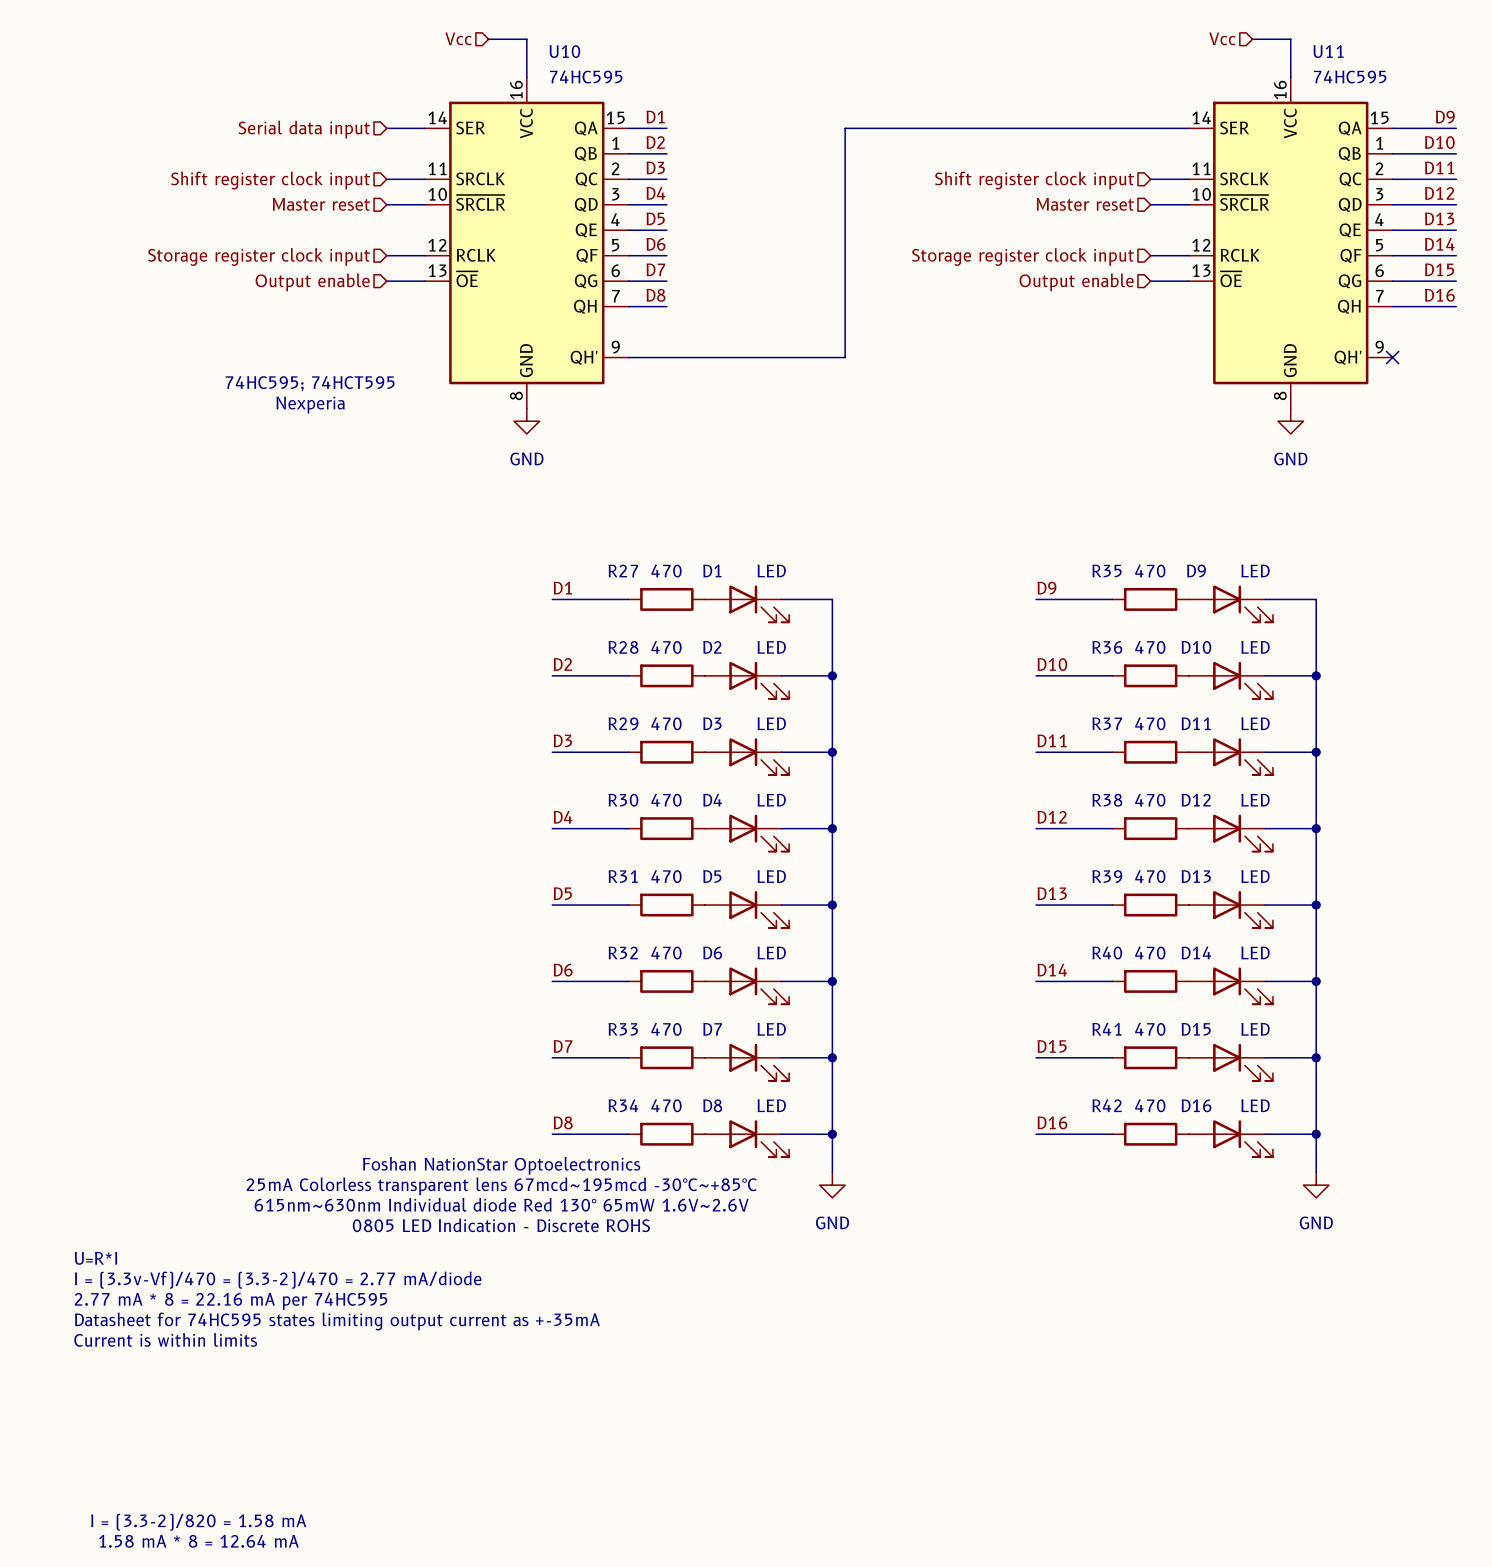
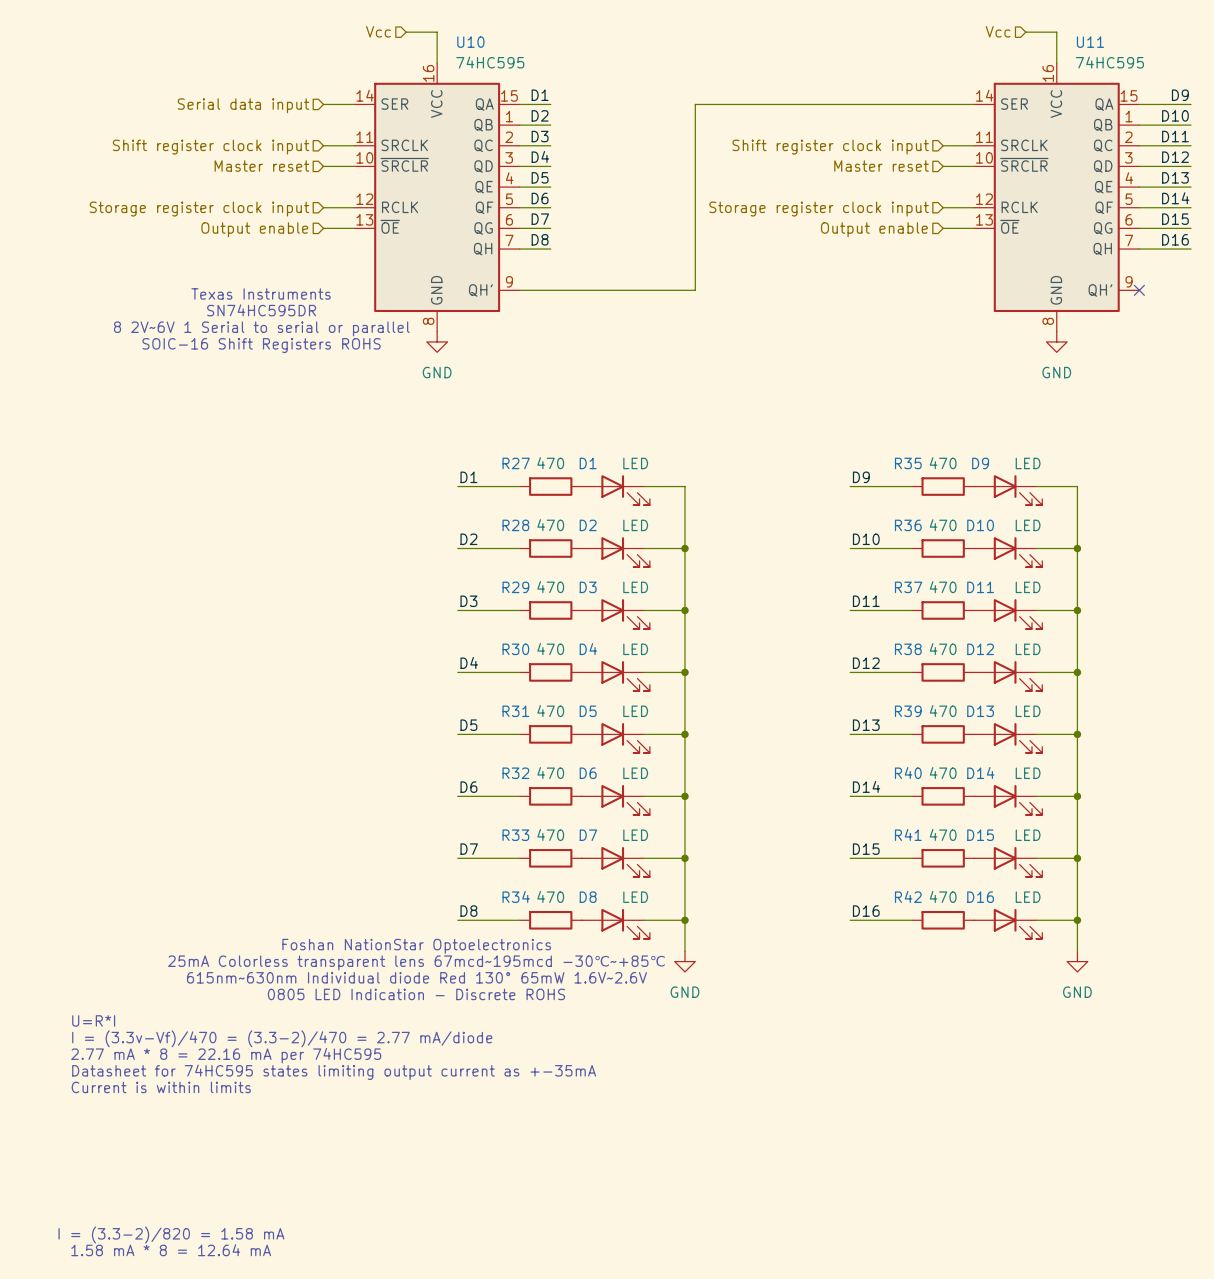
text: none -> Texas Instruments (261, 293)
text: 74HC595; 74HCT595 (310, 383) -> SN74HC595DR (261, 310)
text: Nexperia (310, 405) -> 8 2V~6V 1 Serial to serial or parallel (261, 328)
text: none -> SOIC-16 Shift Registers ROHS (261, 345)

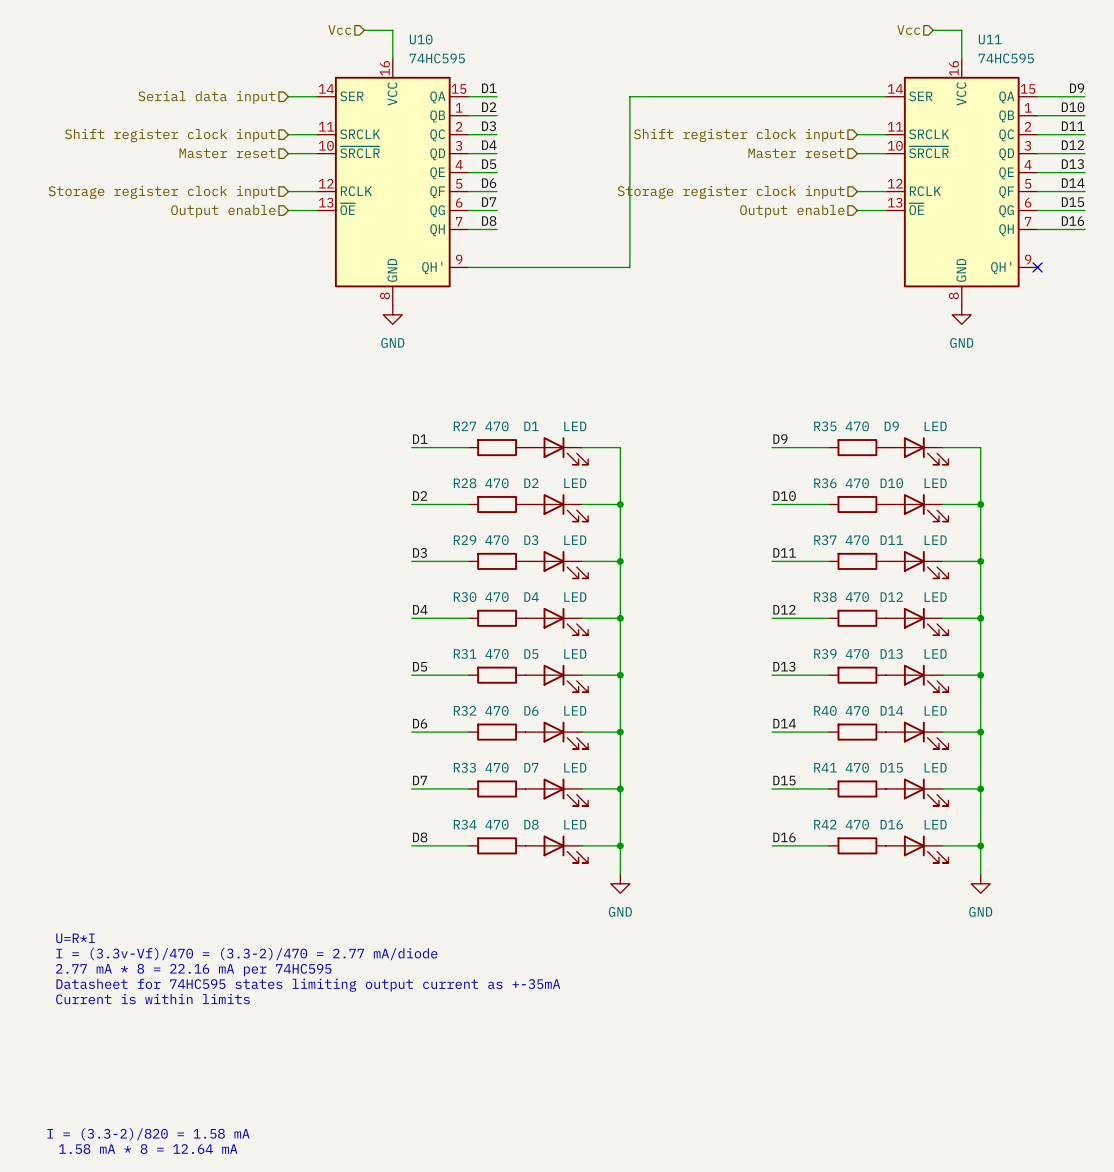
text: Texas Instruments (261, 293) -> none
text: SN74HC595DR (261, 310) -> none
text: 8 2V~6V 1 Serial to serial or parallel (261, 328) -> none
text: SOIC-16 Shift Registers ROHS (261, 345) -> none
text: Foshan NationStar Optoelectronics (416, 946) -> none
text: 25mA Colorless transparent lens 67mcd~195mcd -30℃~+85℃ (416, 962) -> none
text: 615nm~630nm Individual diode Red 130° 65mW 1.6V~2.6V (416, 977) -> none
text: 0805 LED Indication - Discrete ROHS (416, 994) -> none

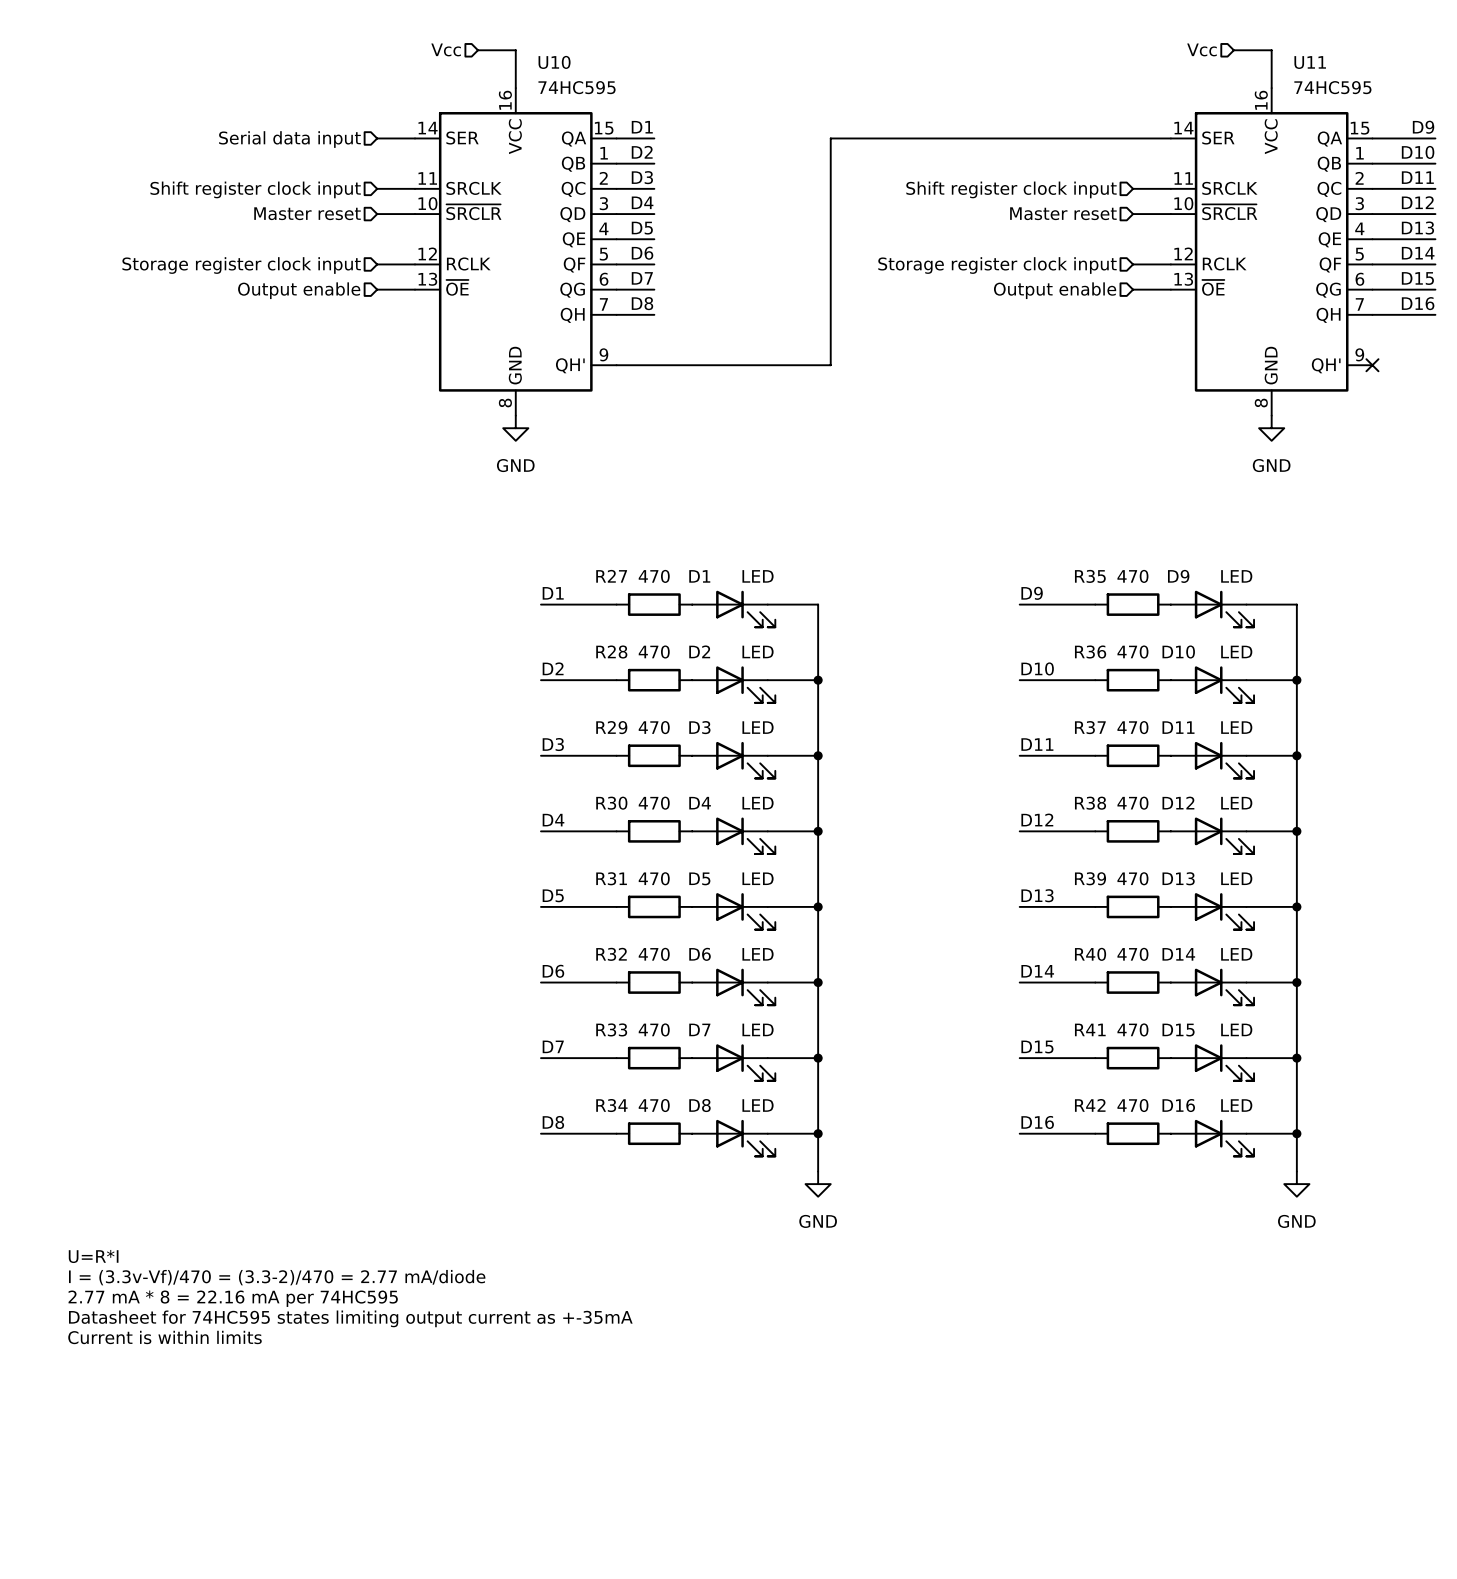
text: I = (3.3-2)/820 = 1.58 mA (148, 1134) -> none
text: 1.58 mA * 8 = 12.64 mA (148, 1149) -> none

